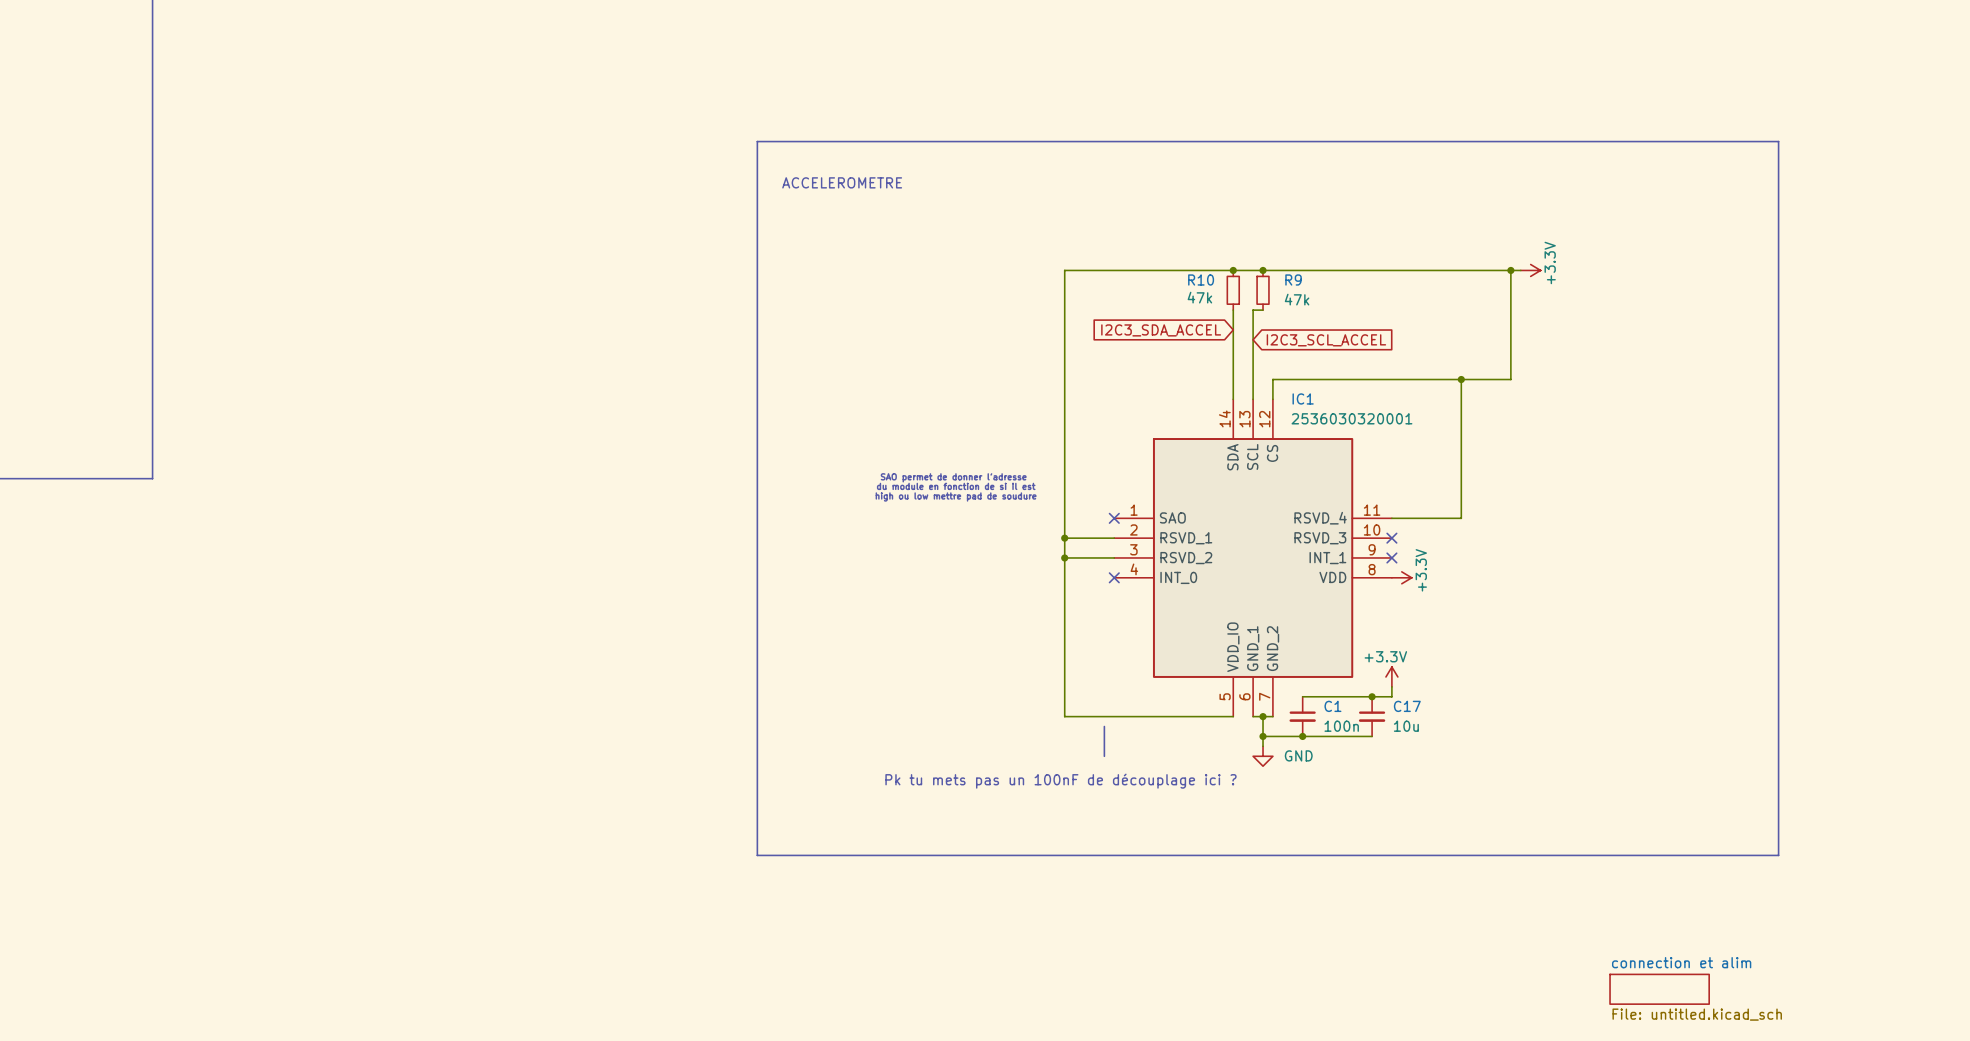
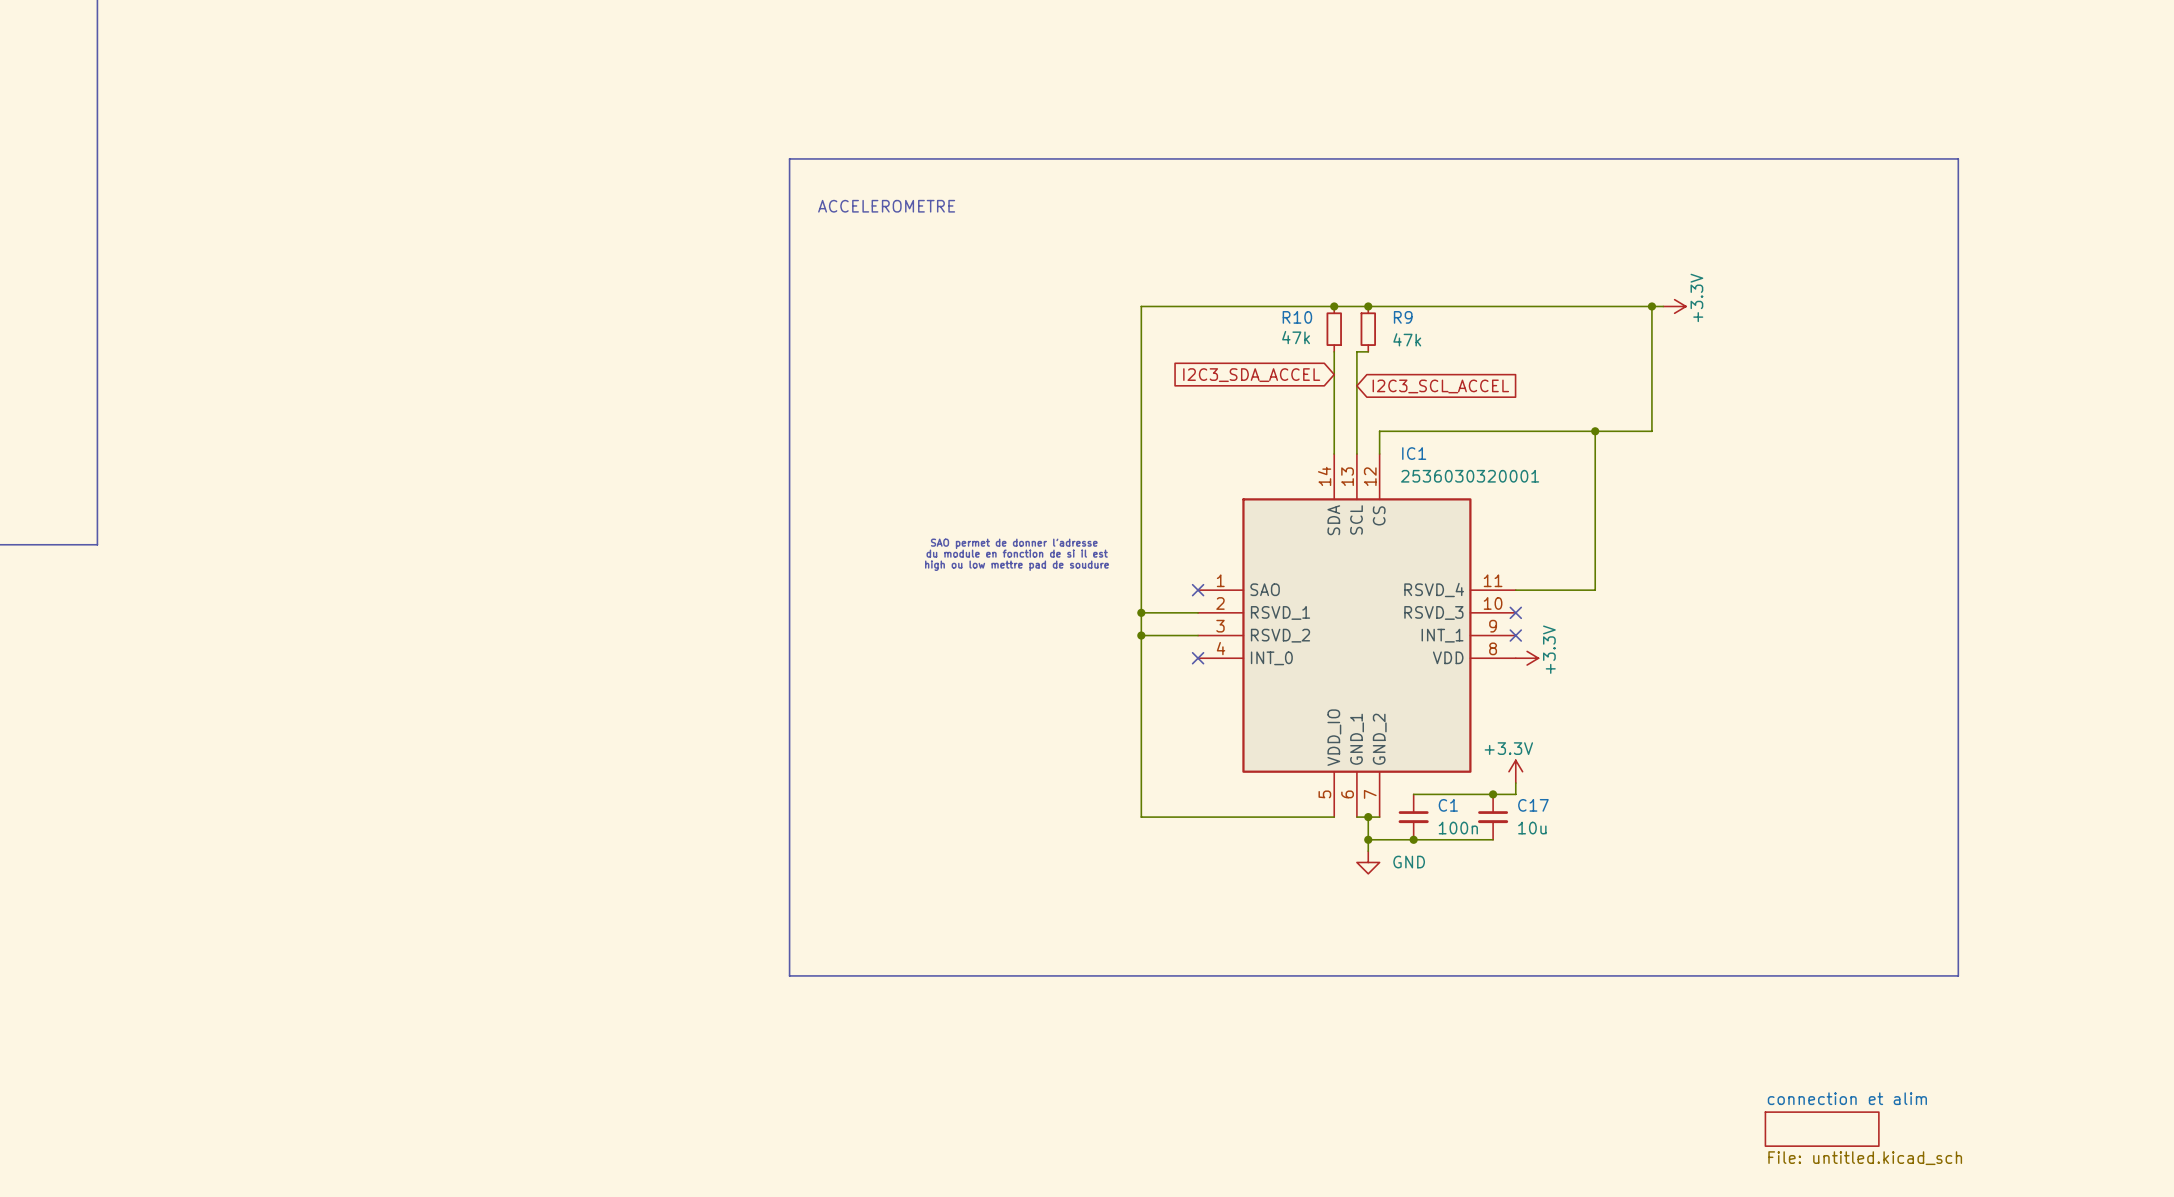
line: (1104, 726) (1104, 756) -> none
text: Pk tu mets pas un 100nF de découplage ici ? (1060, 781) -> none

